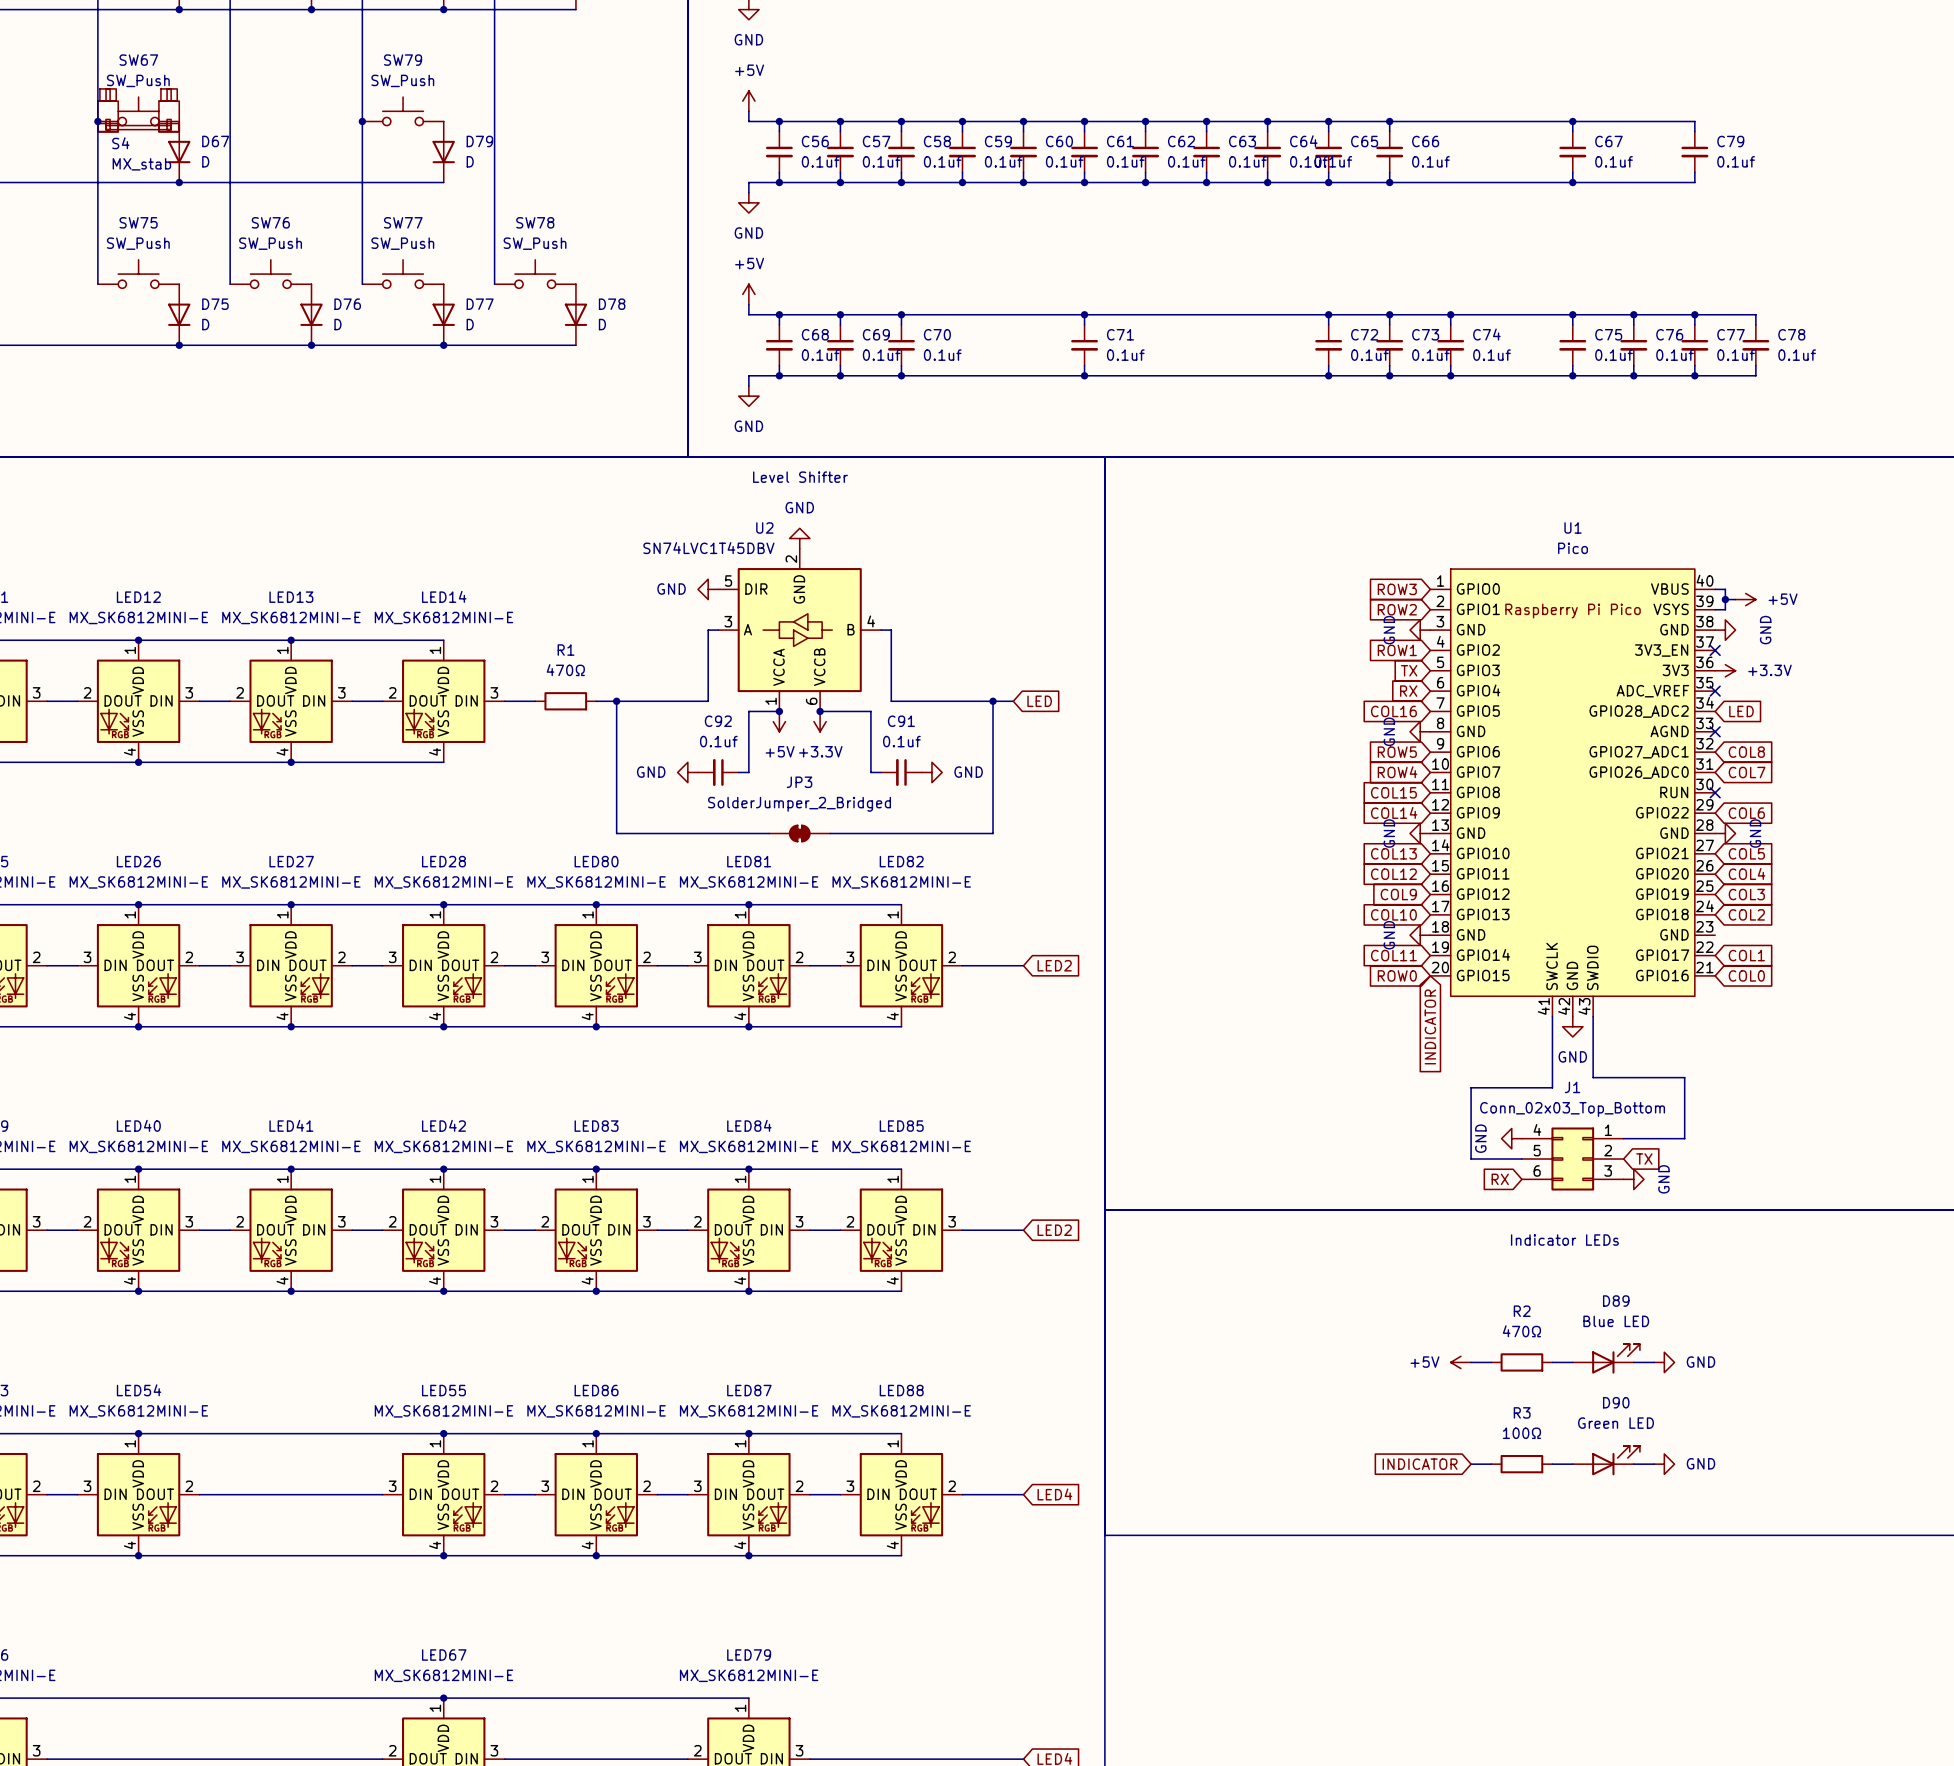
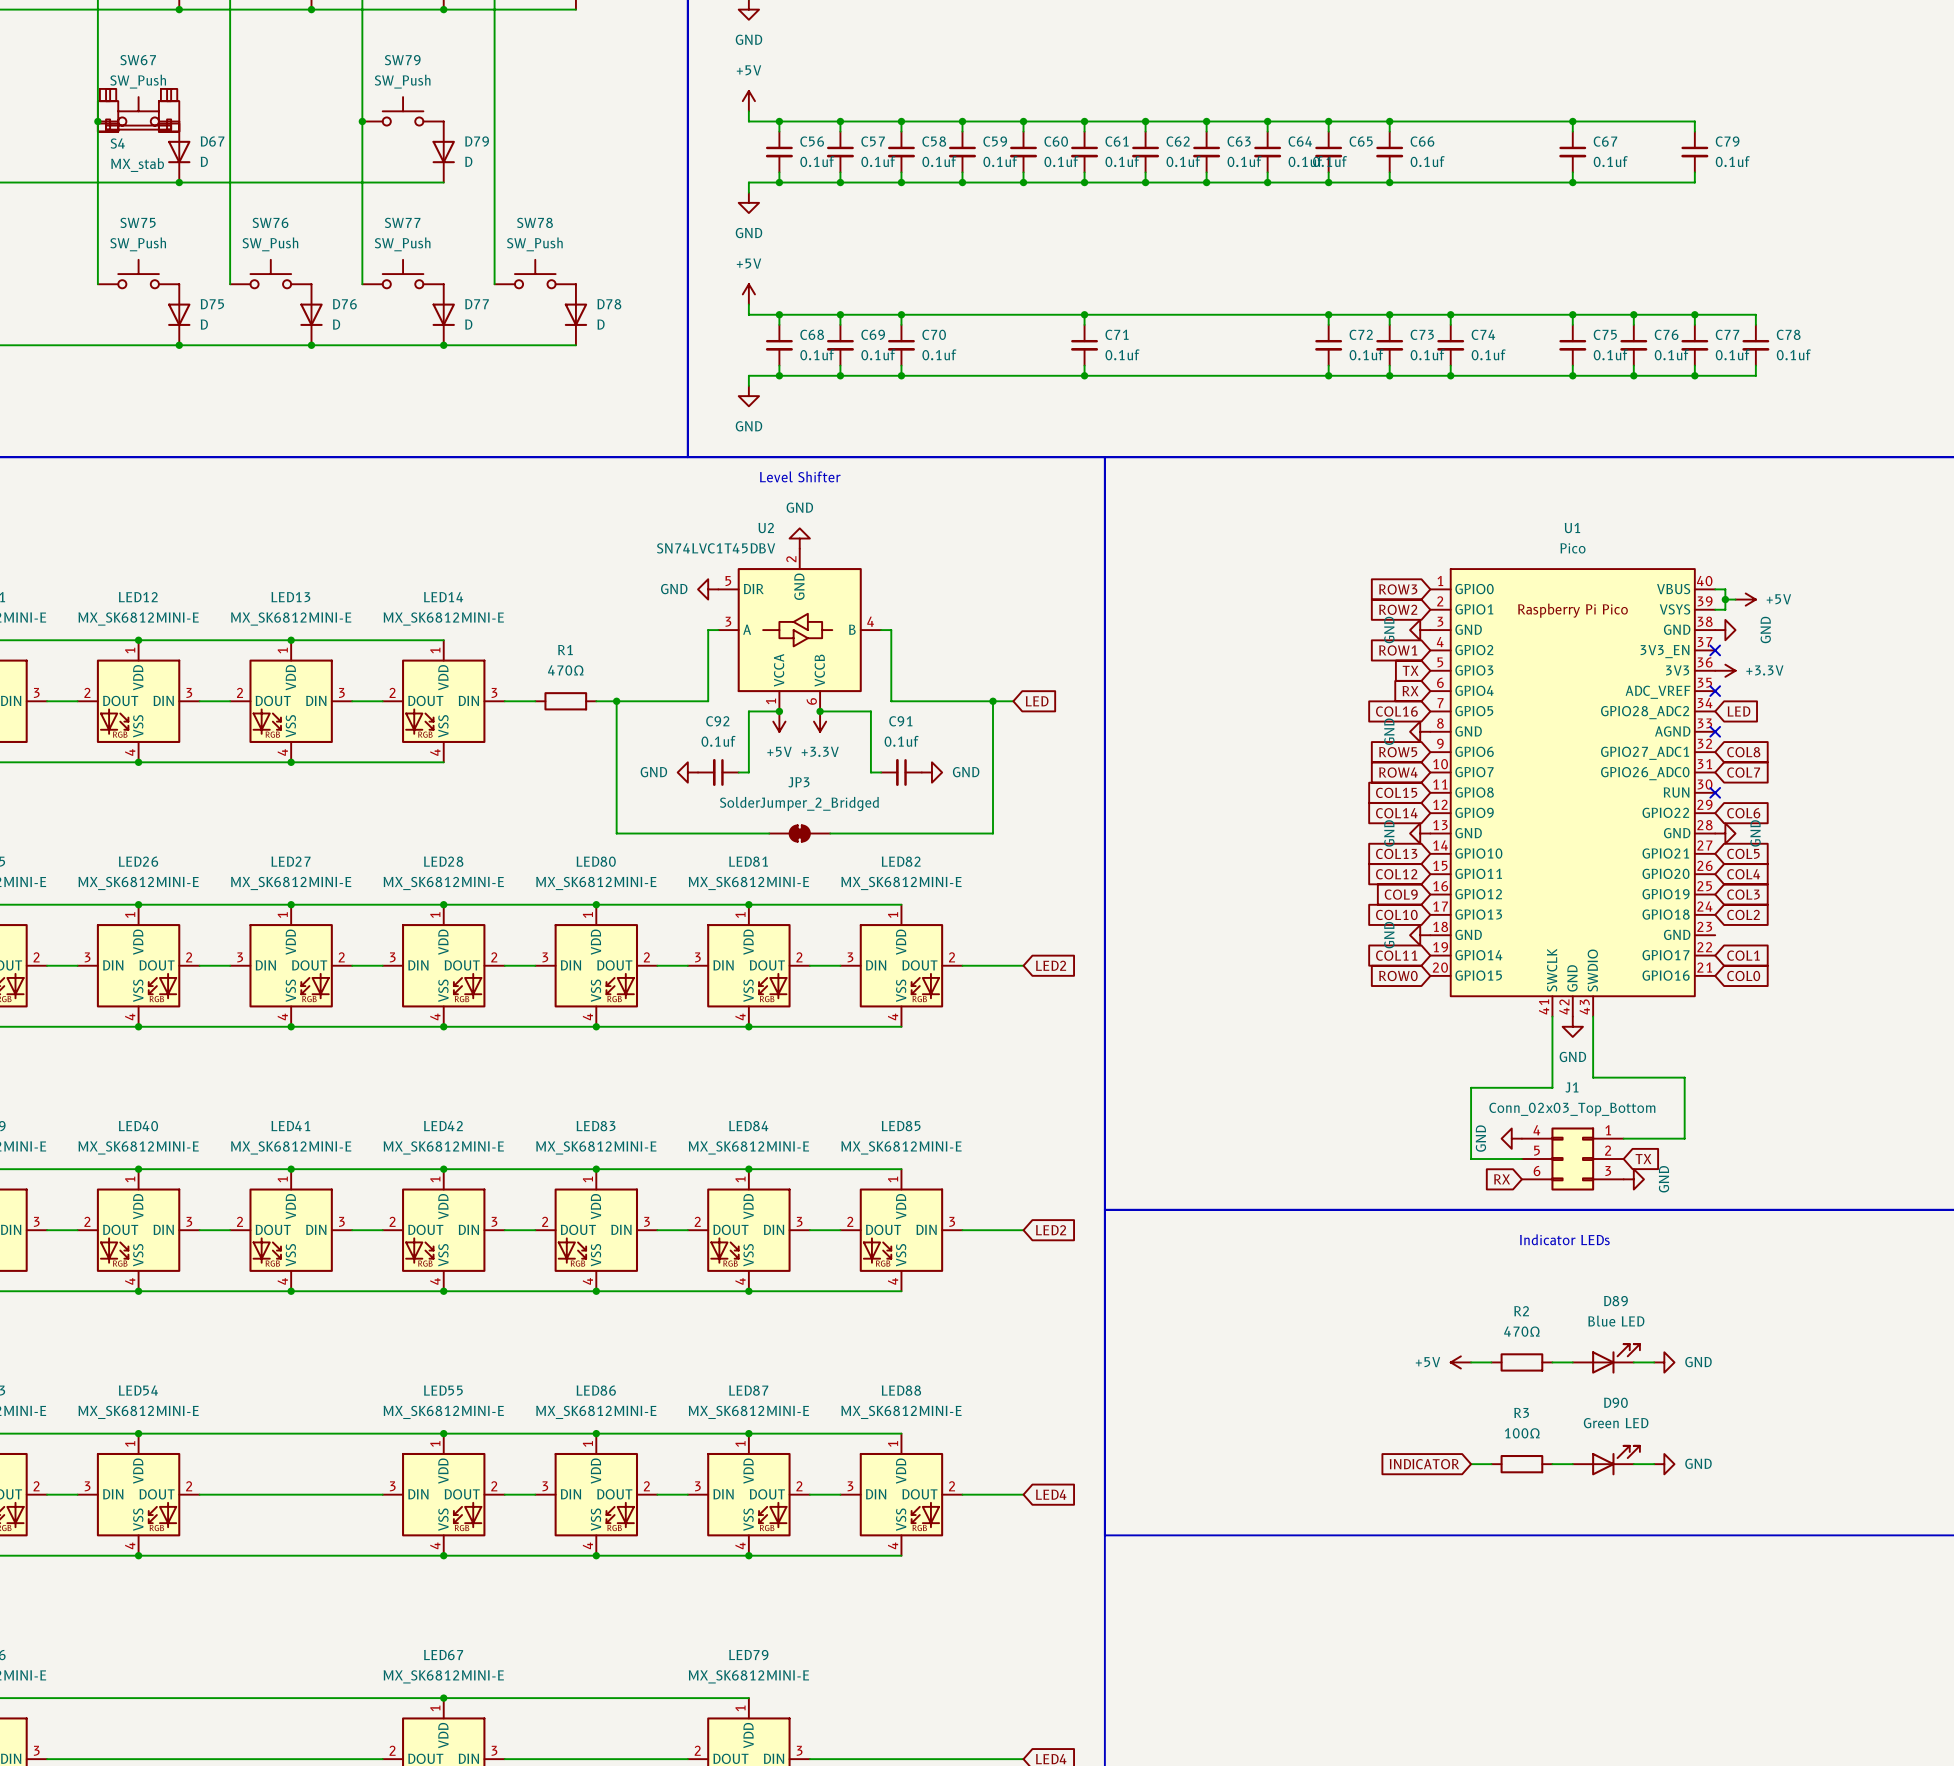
global label: INDICATOR (1430, 1026) -> none

